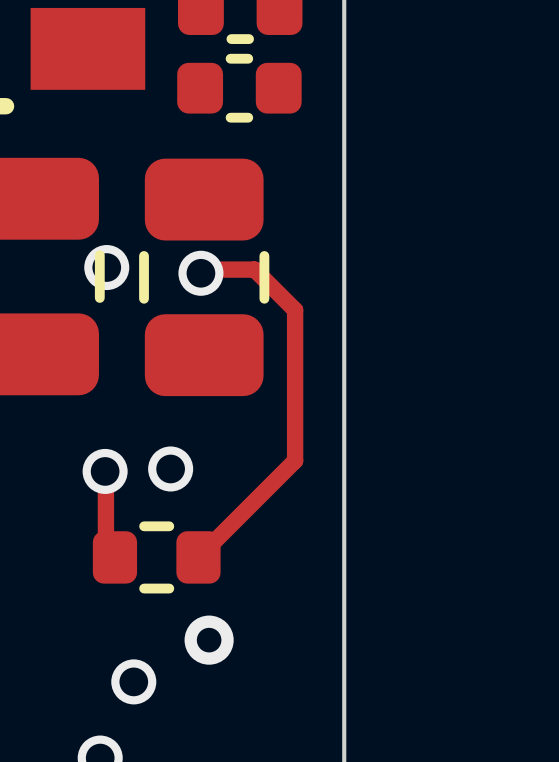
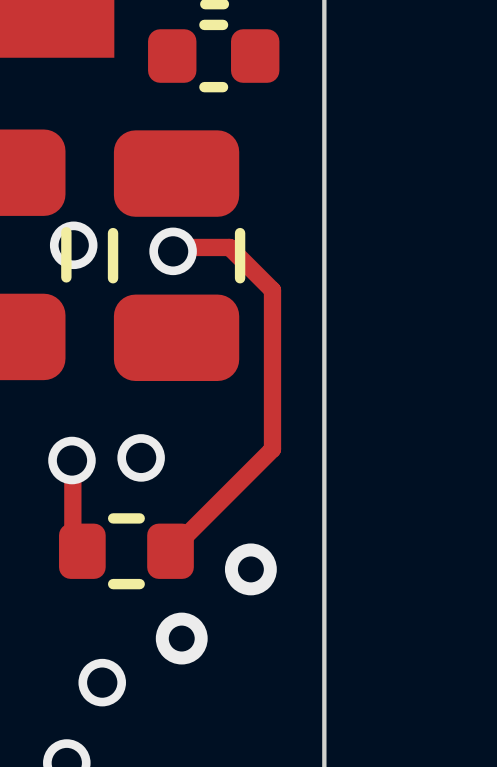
via: none -> (250, 569)

